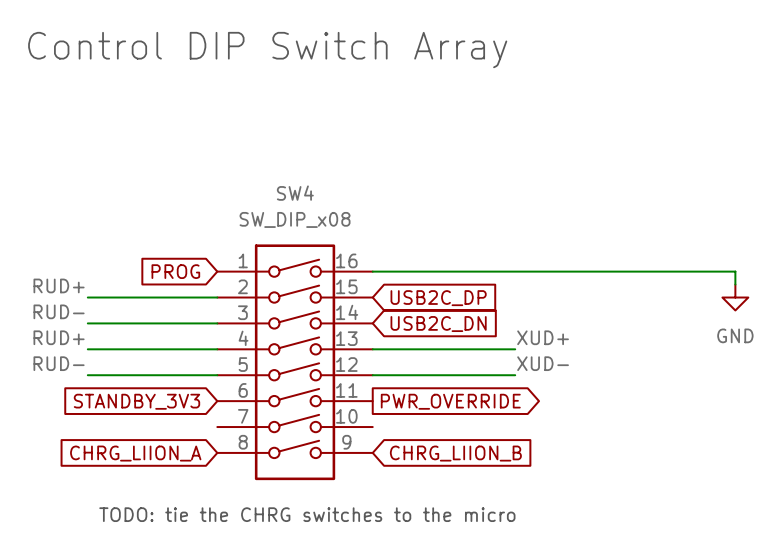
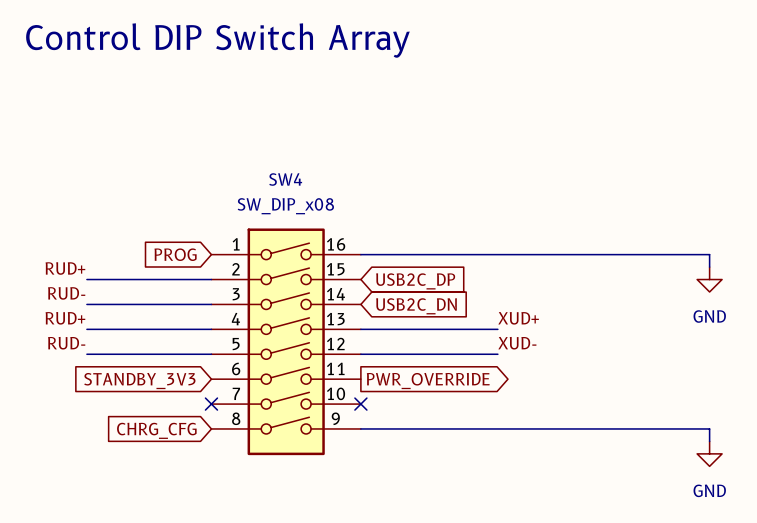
no-connect mark: none -> (211, 404)
no-connect mark: none -> (360, 404)
wire: none -> (360, 428) (709, 428) (709, 441)
global label: CHRG_LIION_A (135, 453) -> CHRG_CFG (156, 430)
global label: CHRG_LIION_B (455, 453) -> none
power symbol: none -> GND (709, 453)
text: TODO: tie the CHRG switches to the micro (307, 514) -> none

